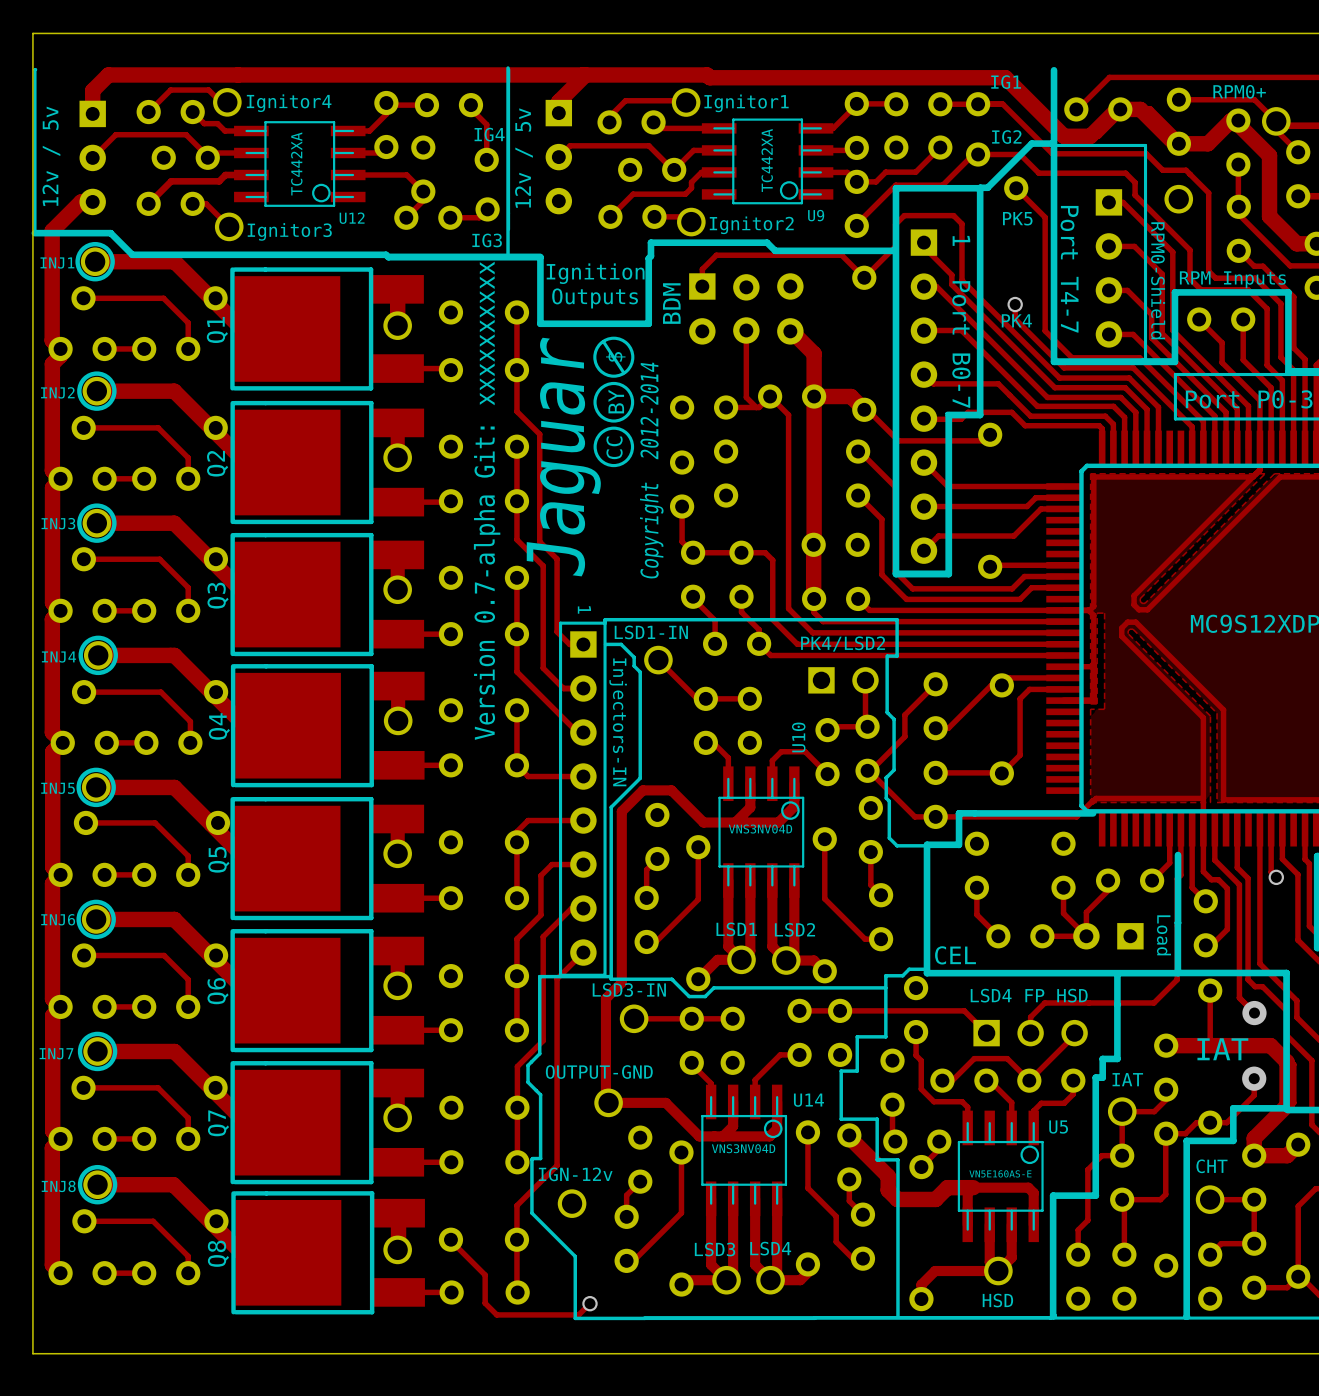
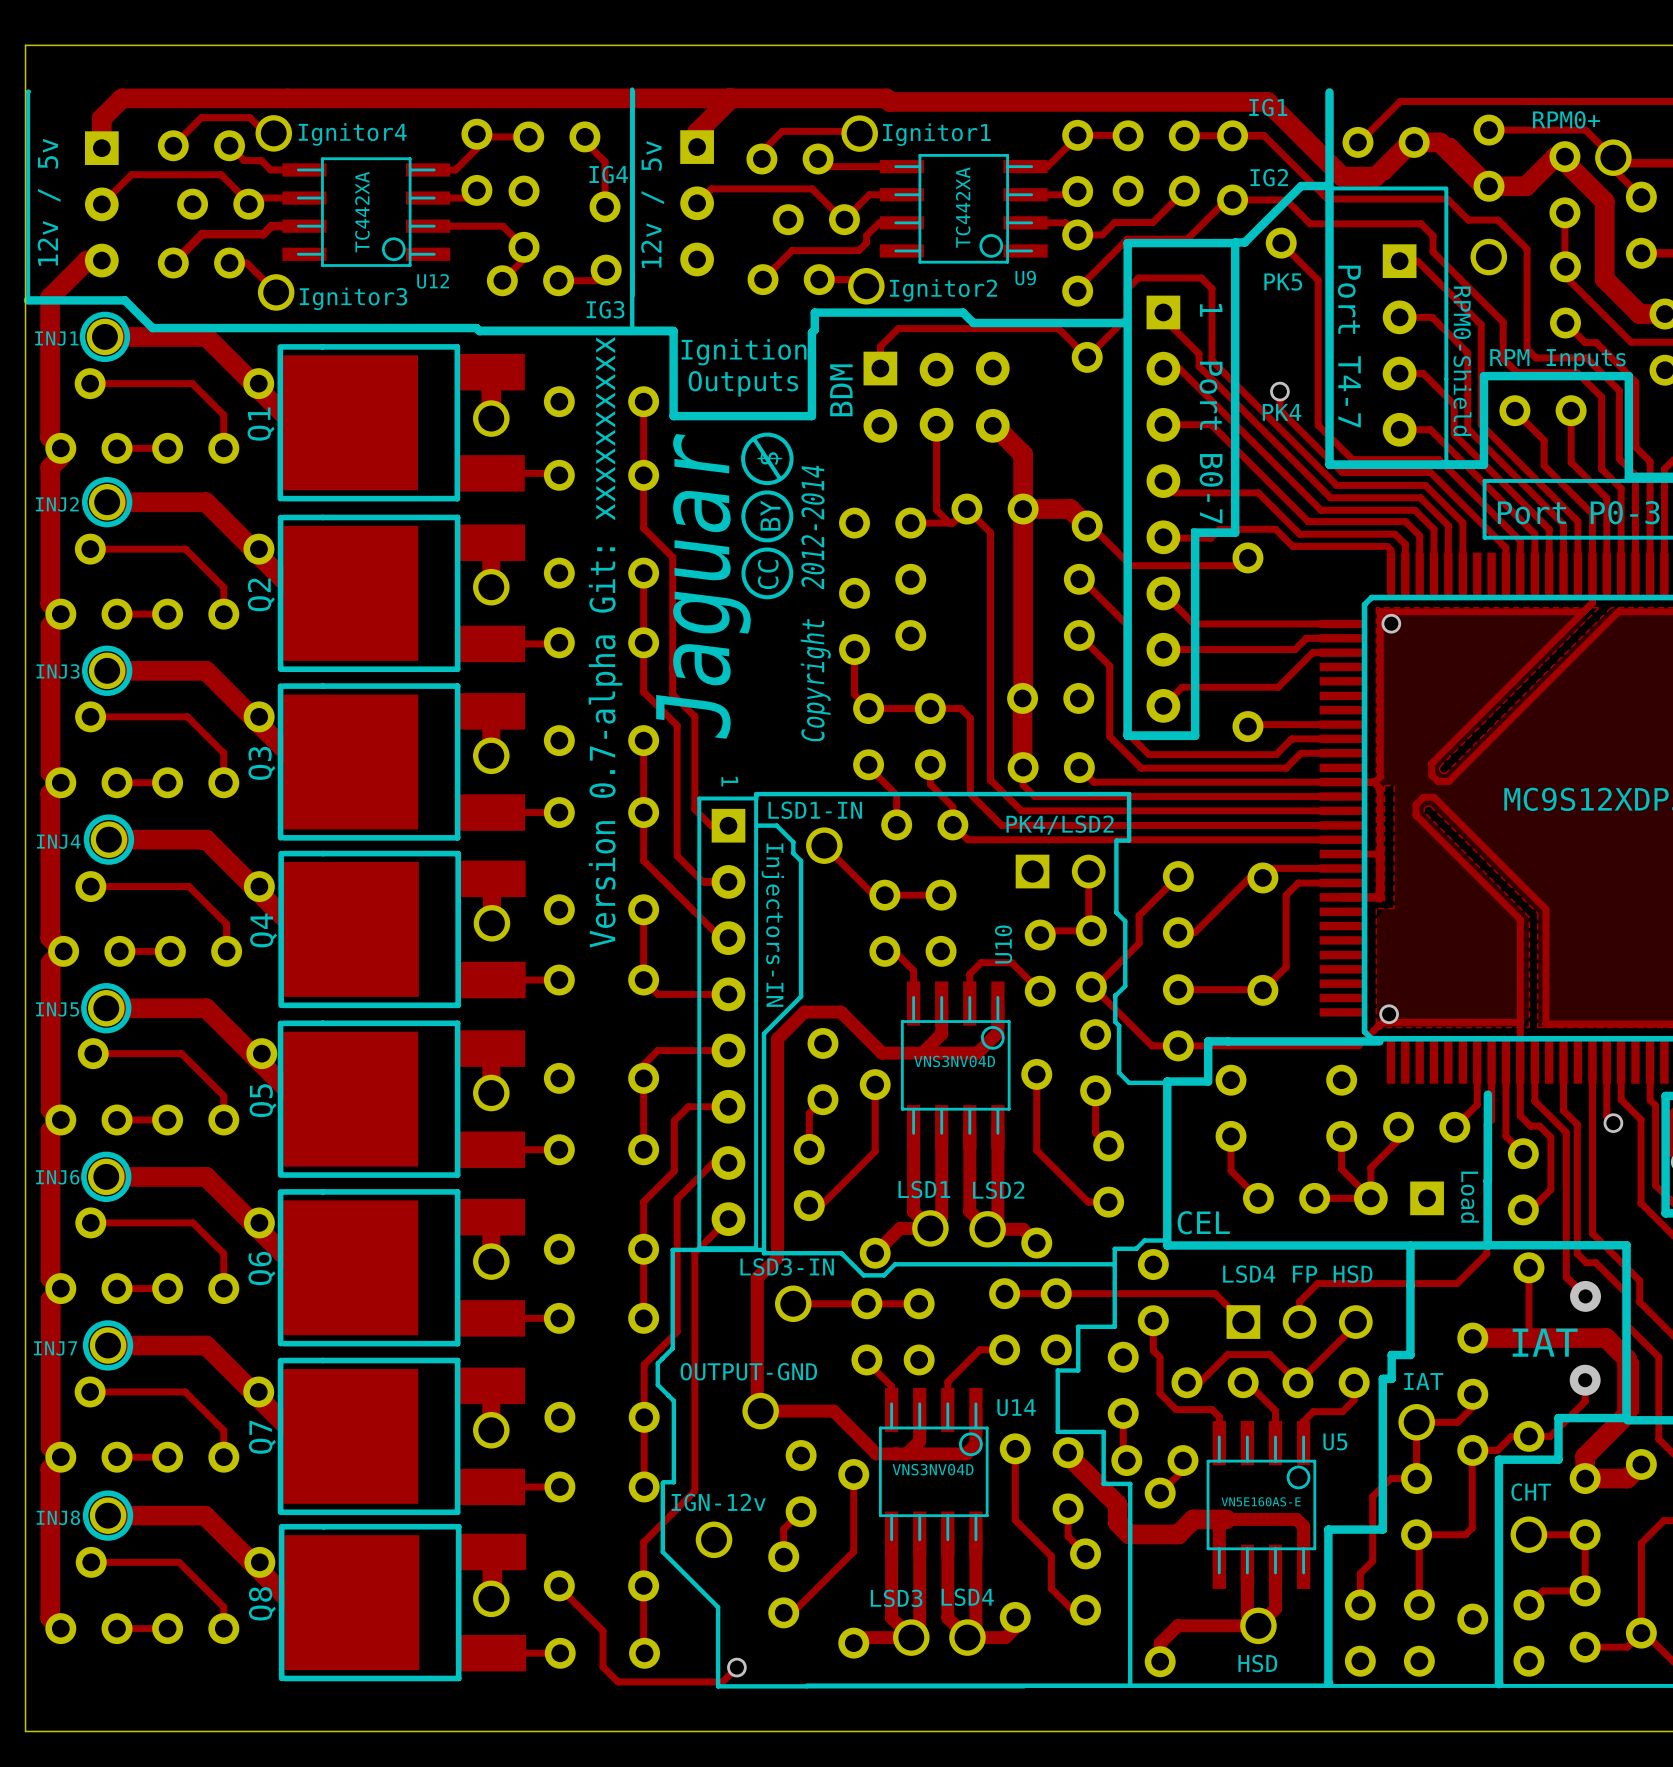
via: none -> (1391, 623)
via: none -> (1389, 1014)

